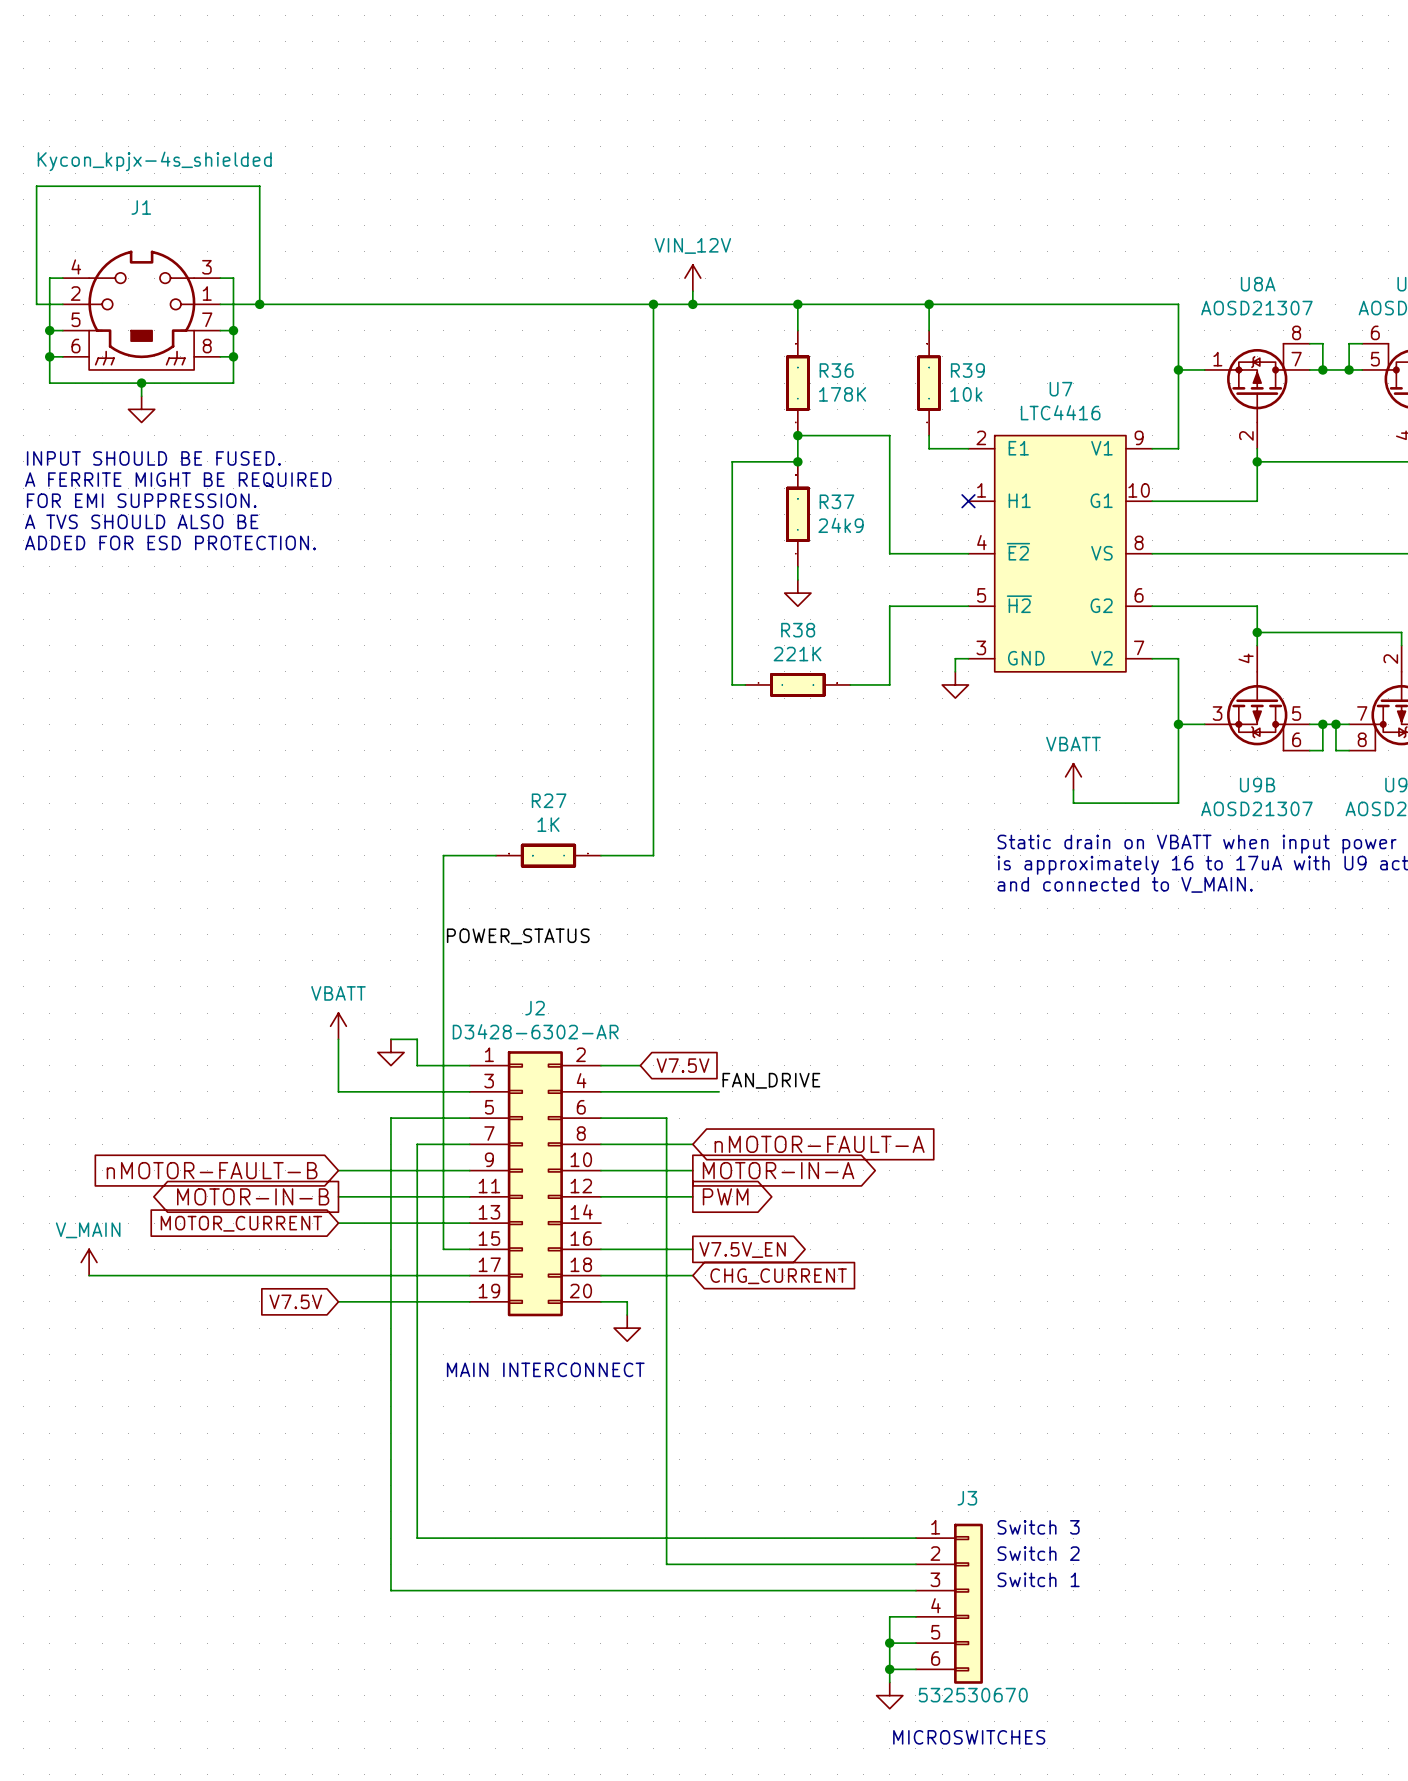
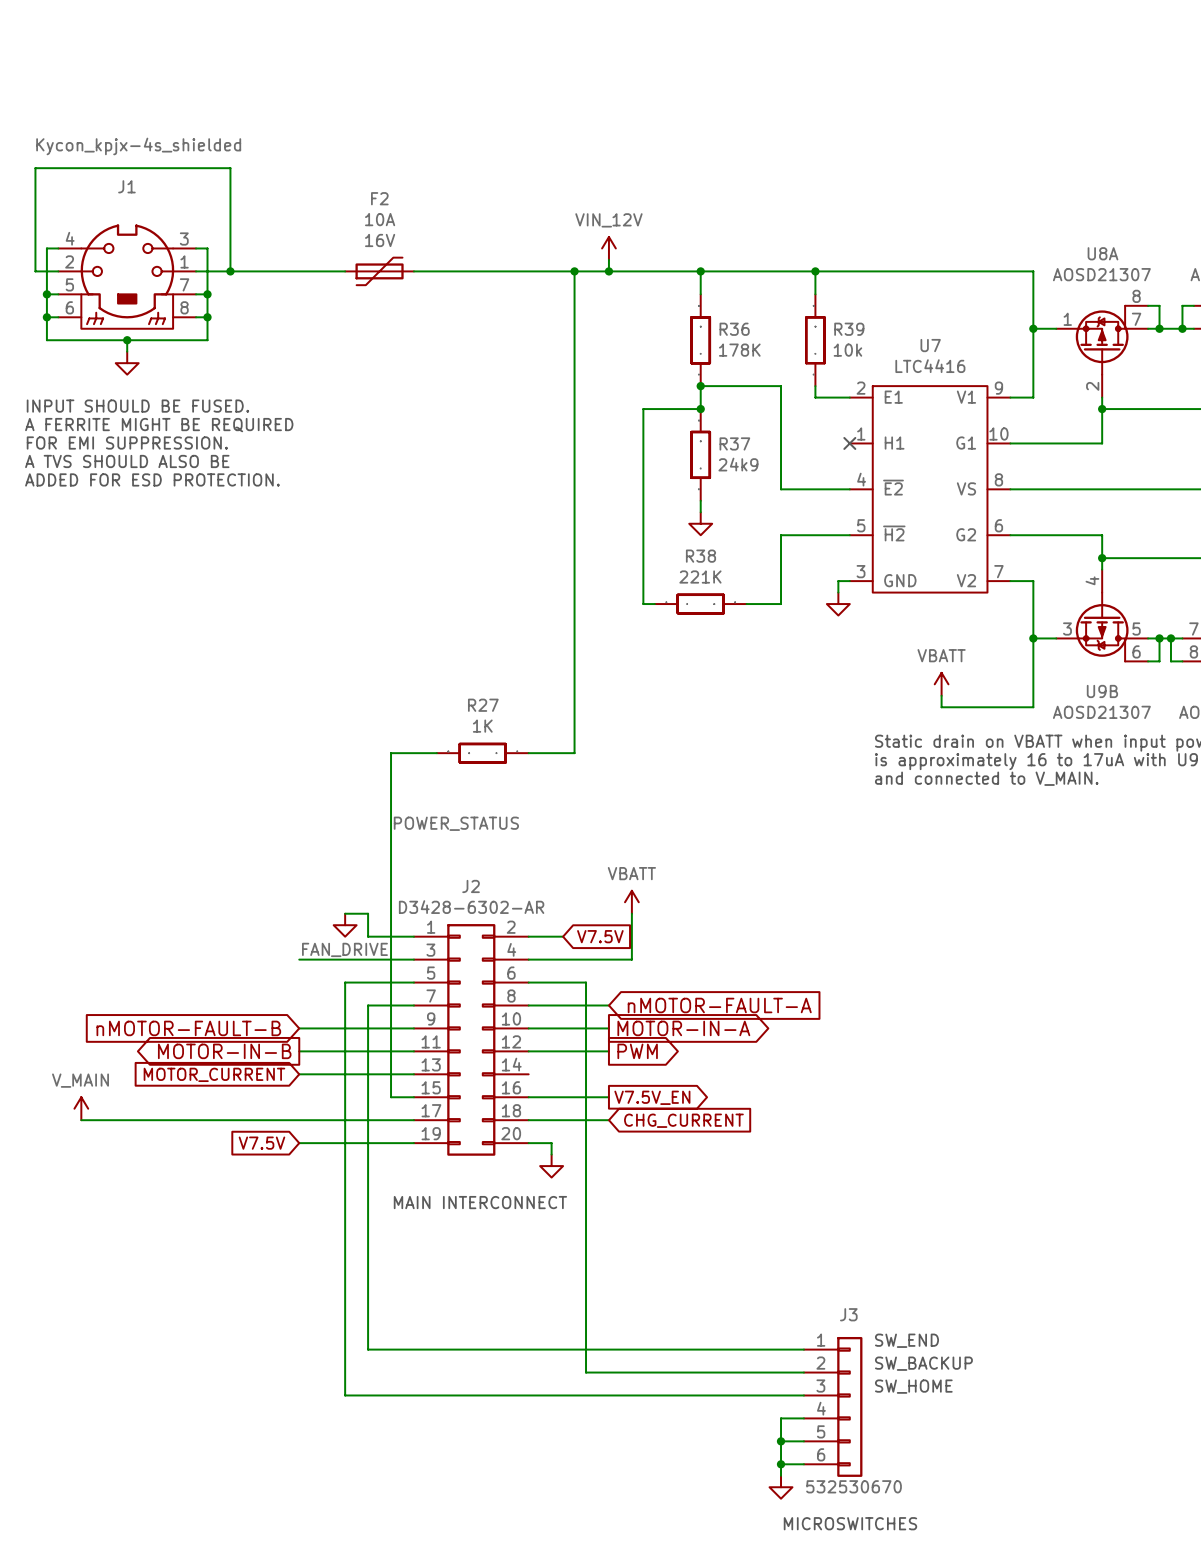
F2: none -> (379, 271)
power symbol: VBATT (338, 1026) -> none
power symbol: none -> VBATT (631, 902)
wire: (338, 1039) (338, 1091) -> none
wire: none -> (631, 913) (631, 959)
label: none -> FAN_DRIVE (344, 949)
label: FAN_DRIVE (771, 1080) -> none
text: Switch 3 (1038, 1527) -> SW_END (906, 1340)
text: Switch 2 (1038, 1553) -> SW_BACKUP (923, 1363)
text: Switch 1 (1038, 1579) -> SW_HOME (913, 1386)

